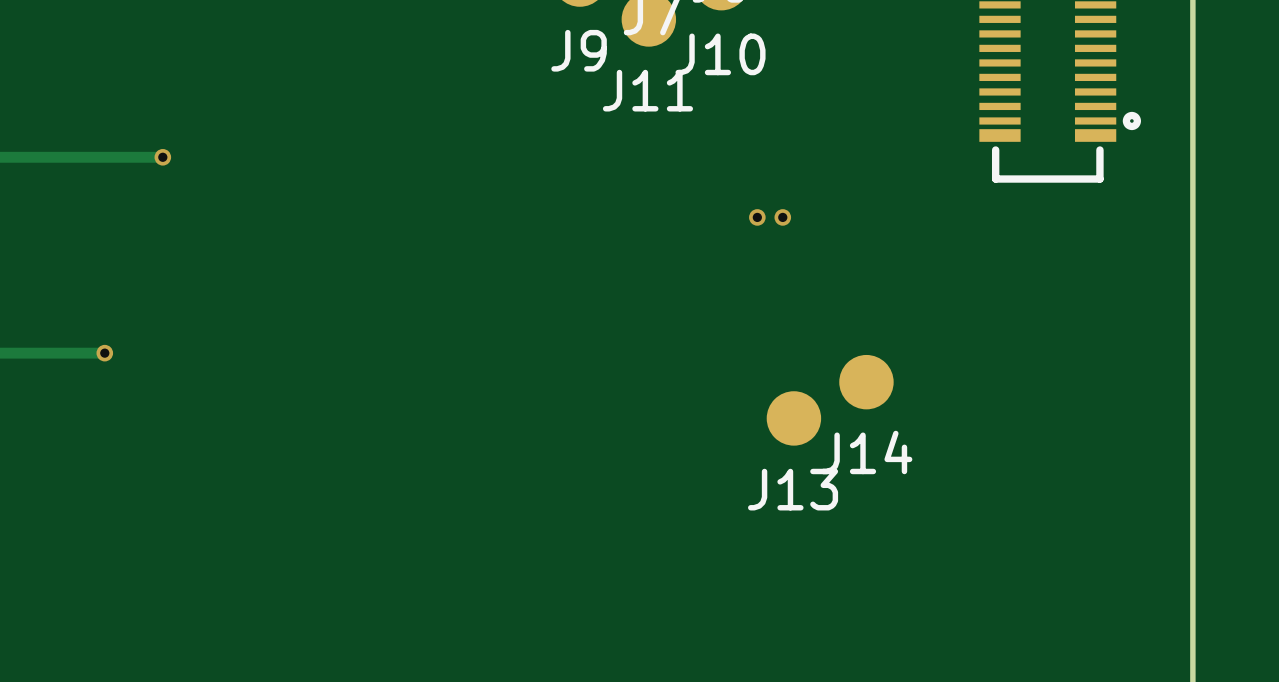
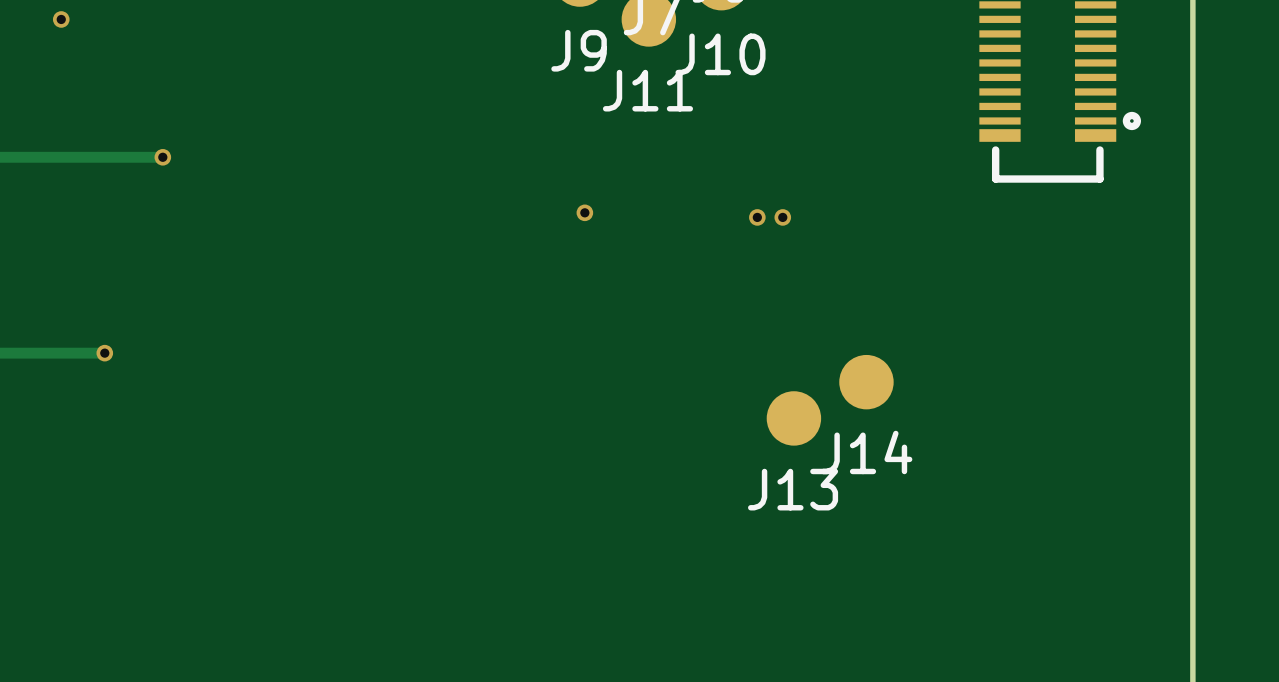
via: none -> (61, 19)
via: none -> (584, 212)

